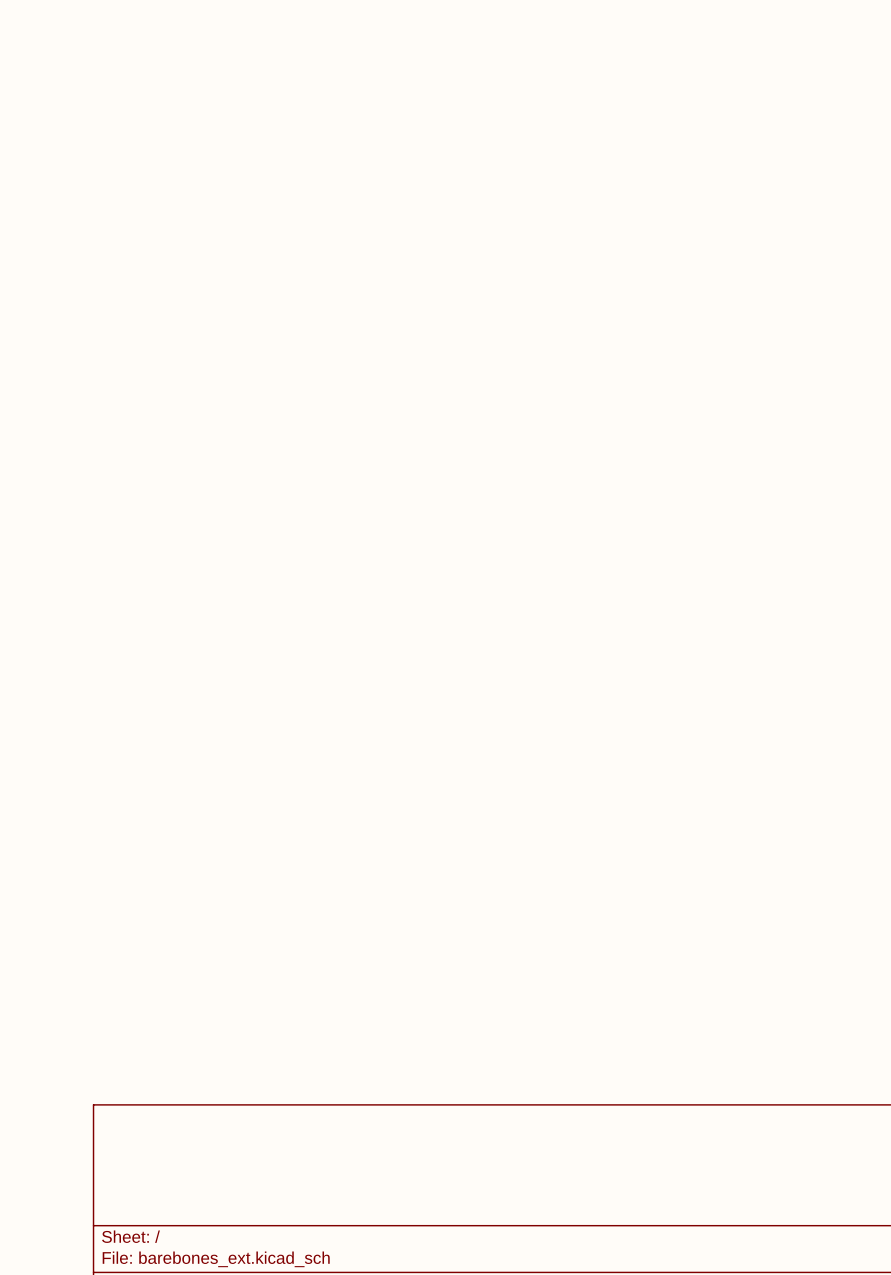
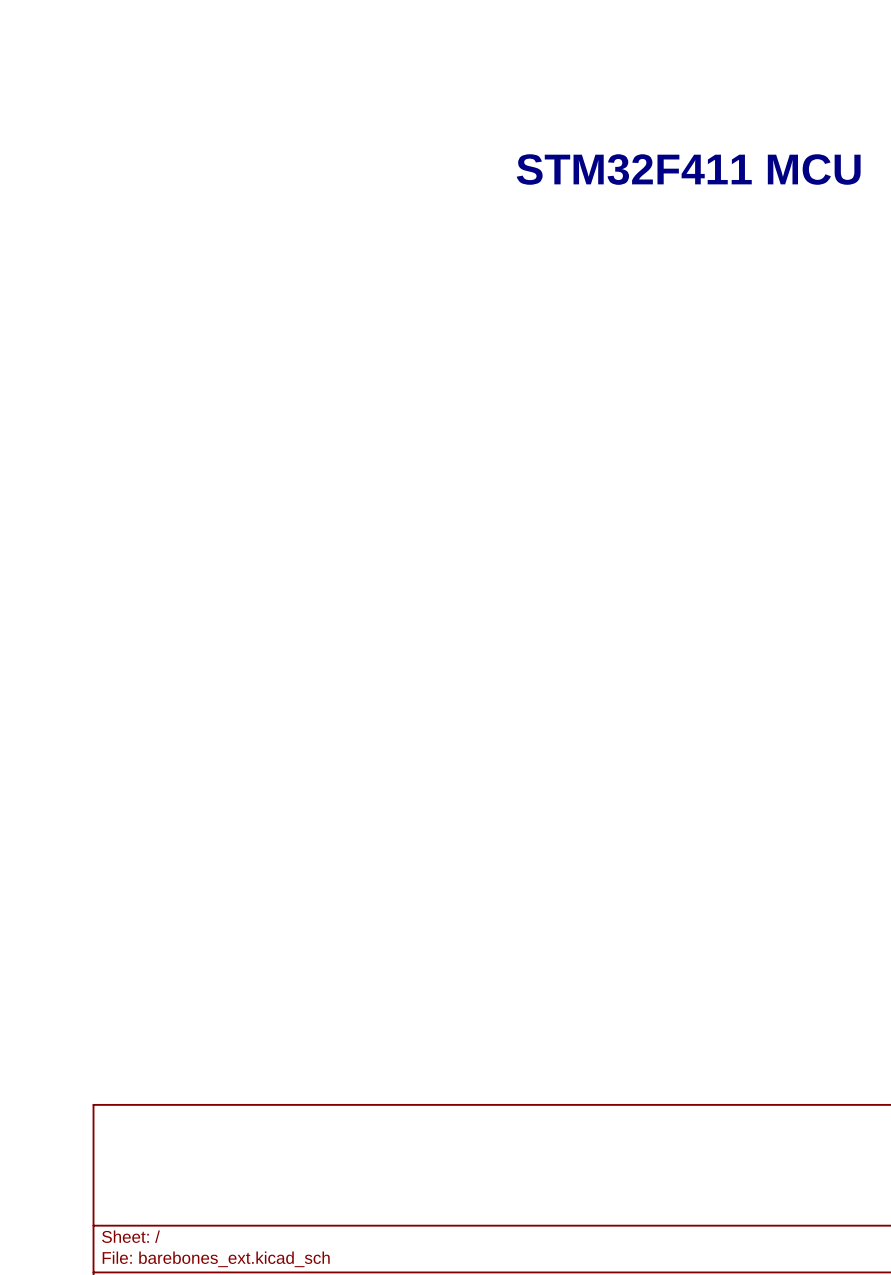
text: none -> STM32F411 MCU (688, 169)

